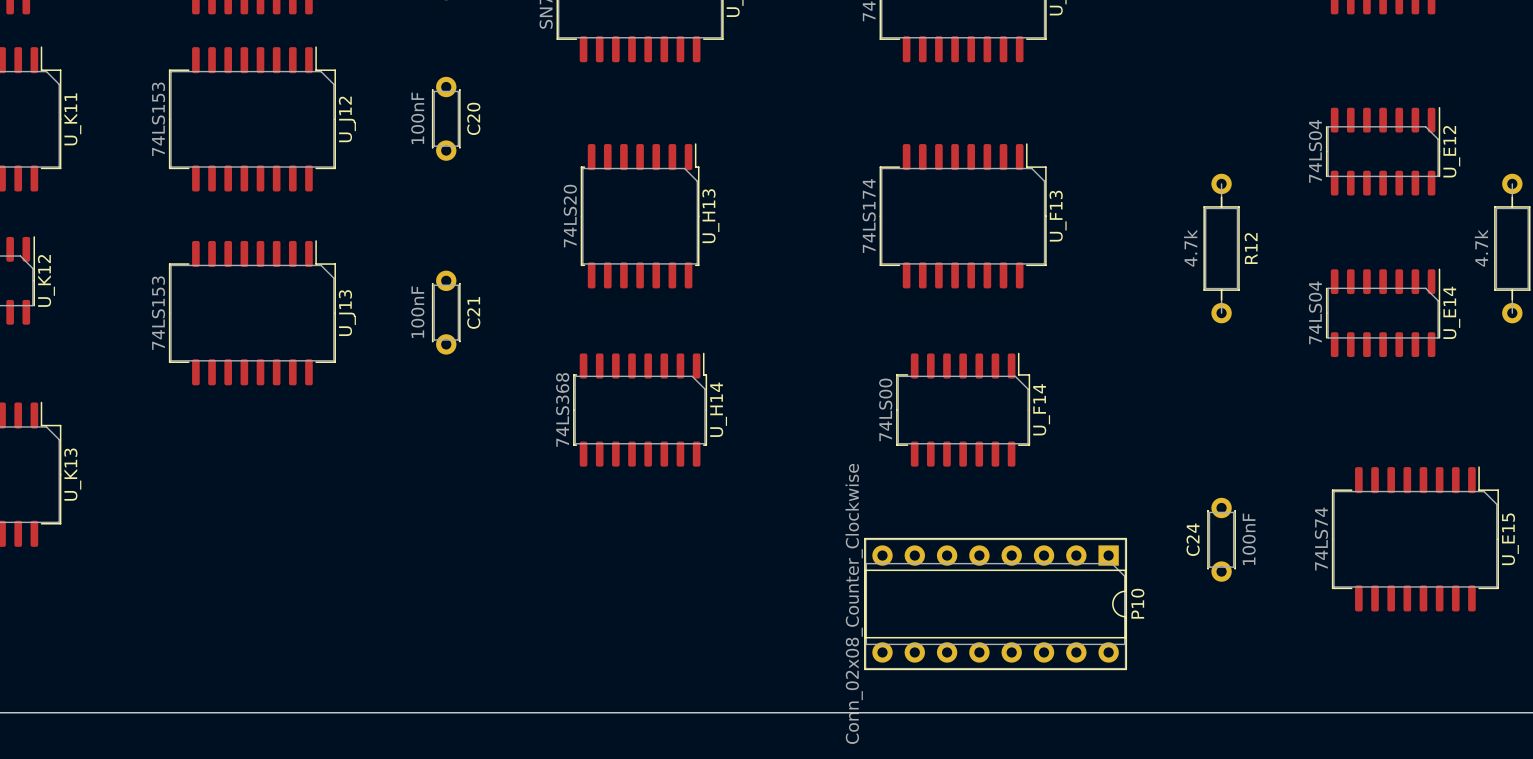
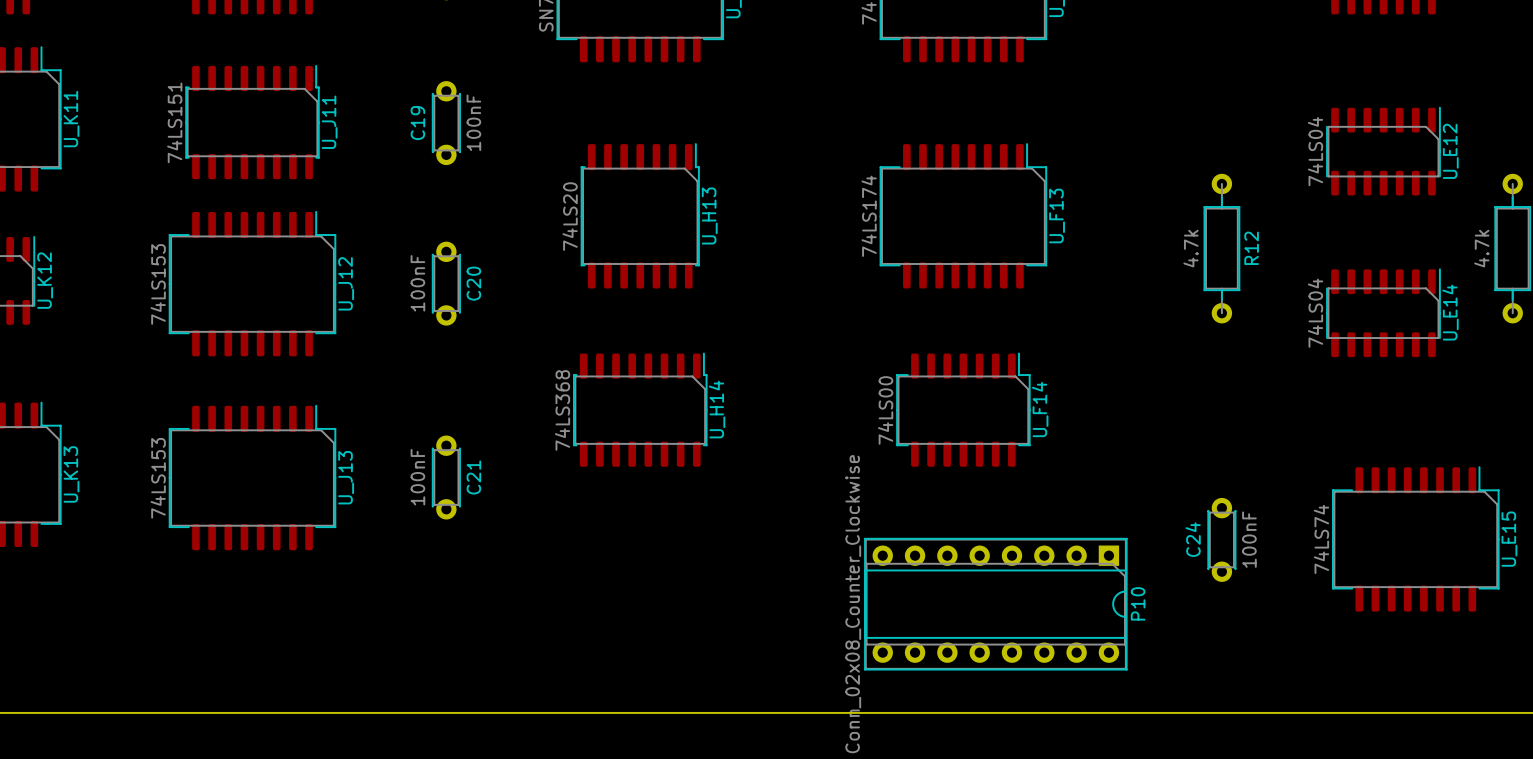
U_J12 position: (252, 118) -> (252, 283)
C20 position: (446, 118) -> (446, 283)
U_J11: none -> 74LS151 (252, 122)
C19: none -> 100nF (446, 123)
U_J13 position: (252, 312) -> (252, 477)
C21 position: (446, 312) -> (446, 477)

